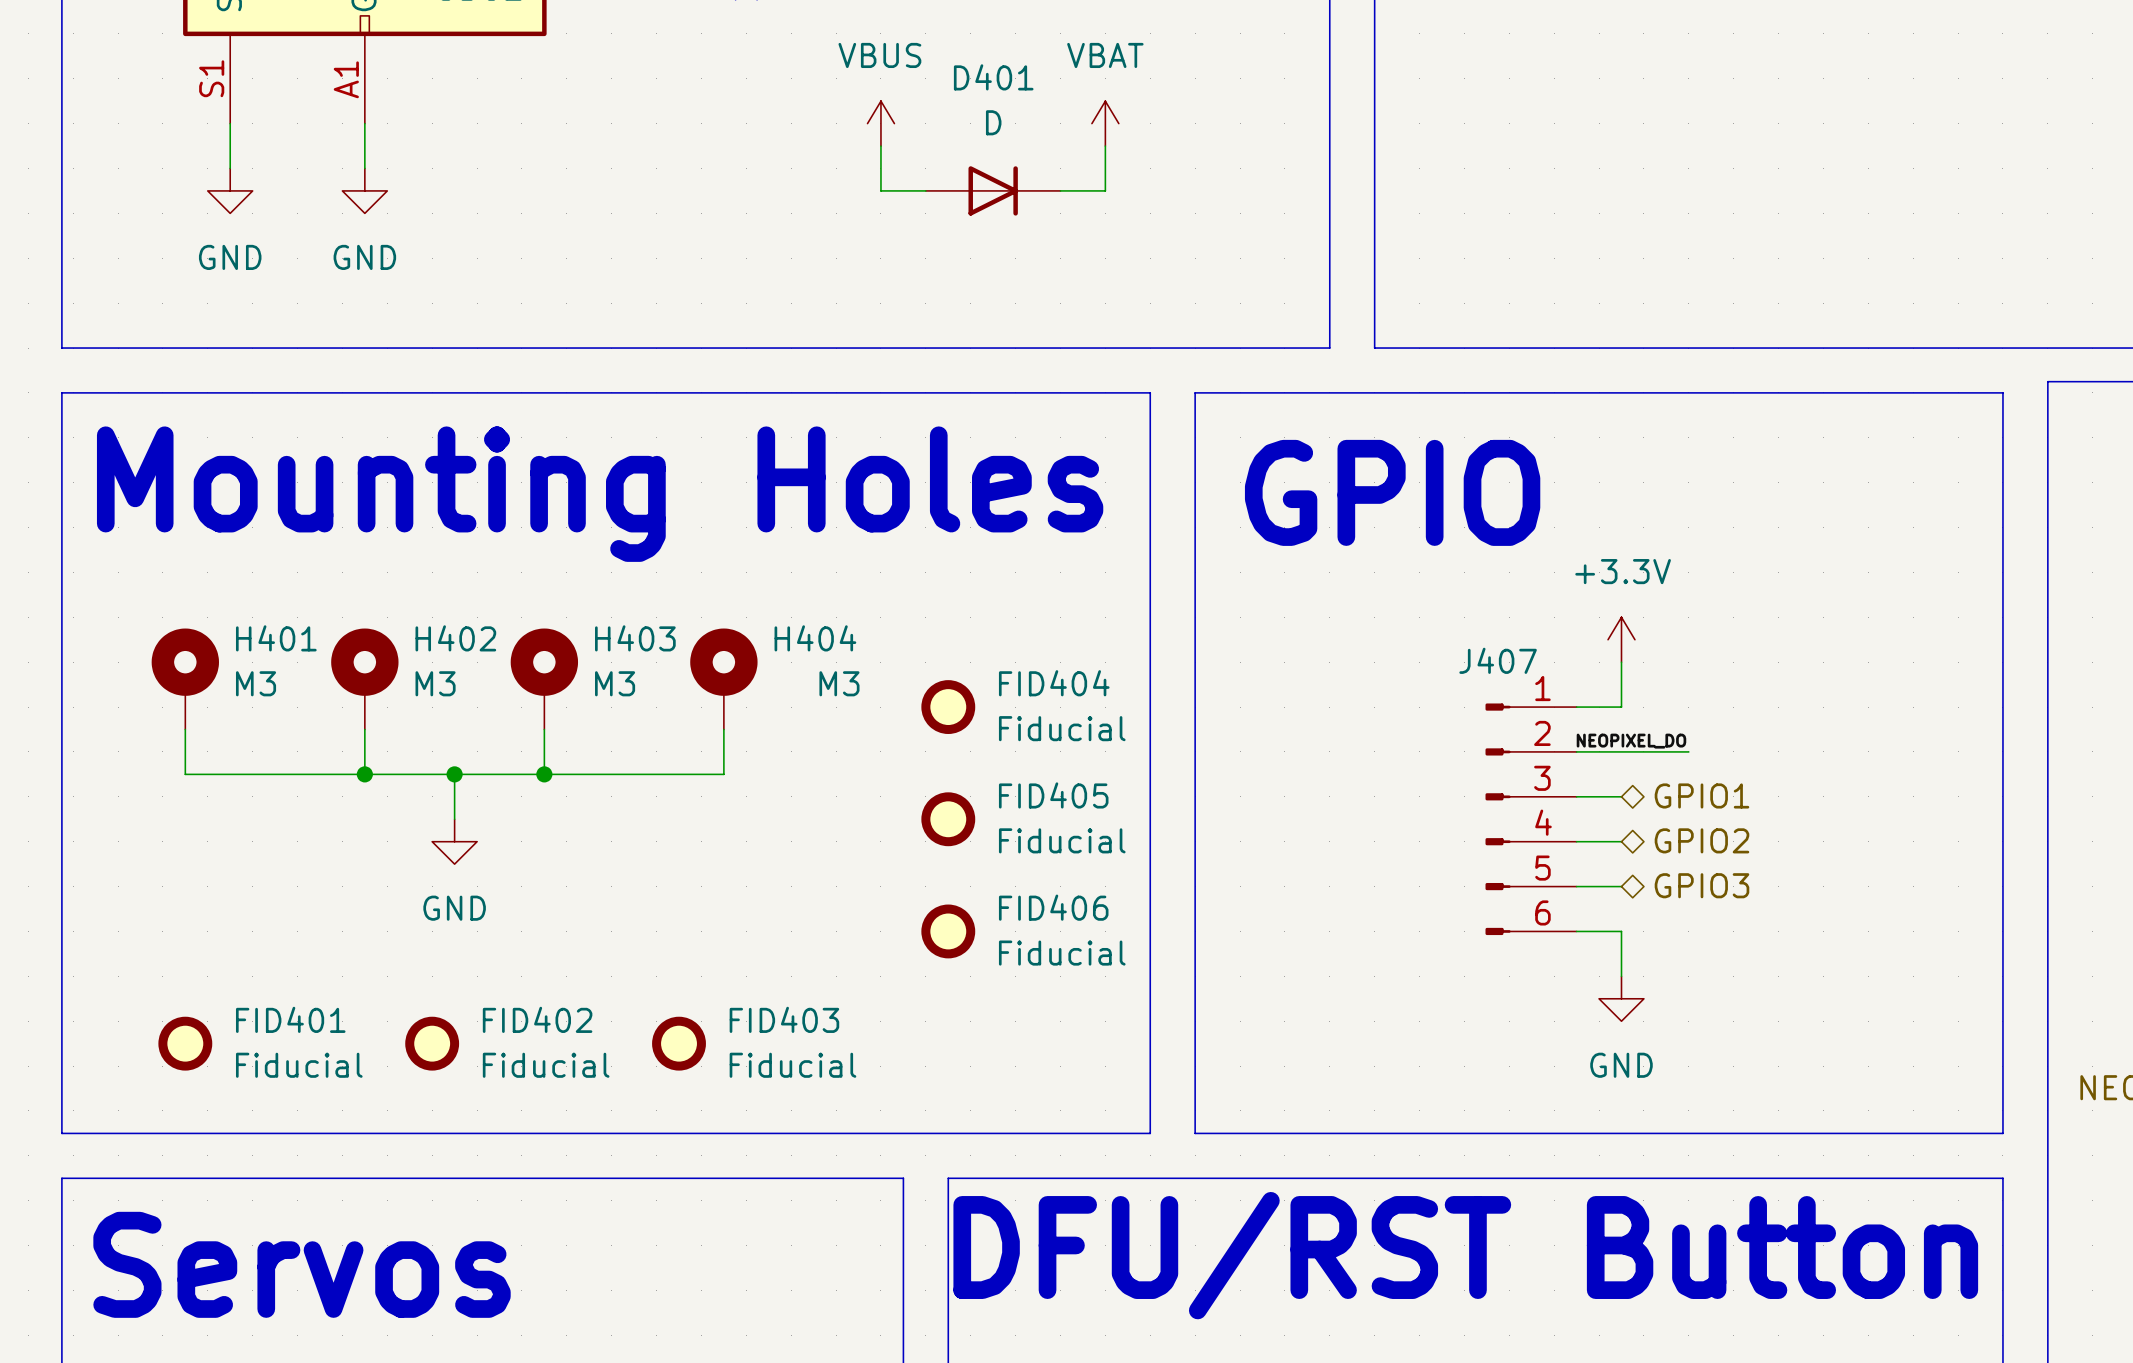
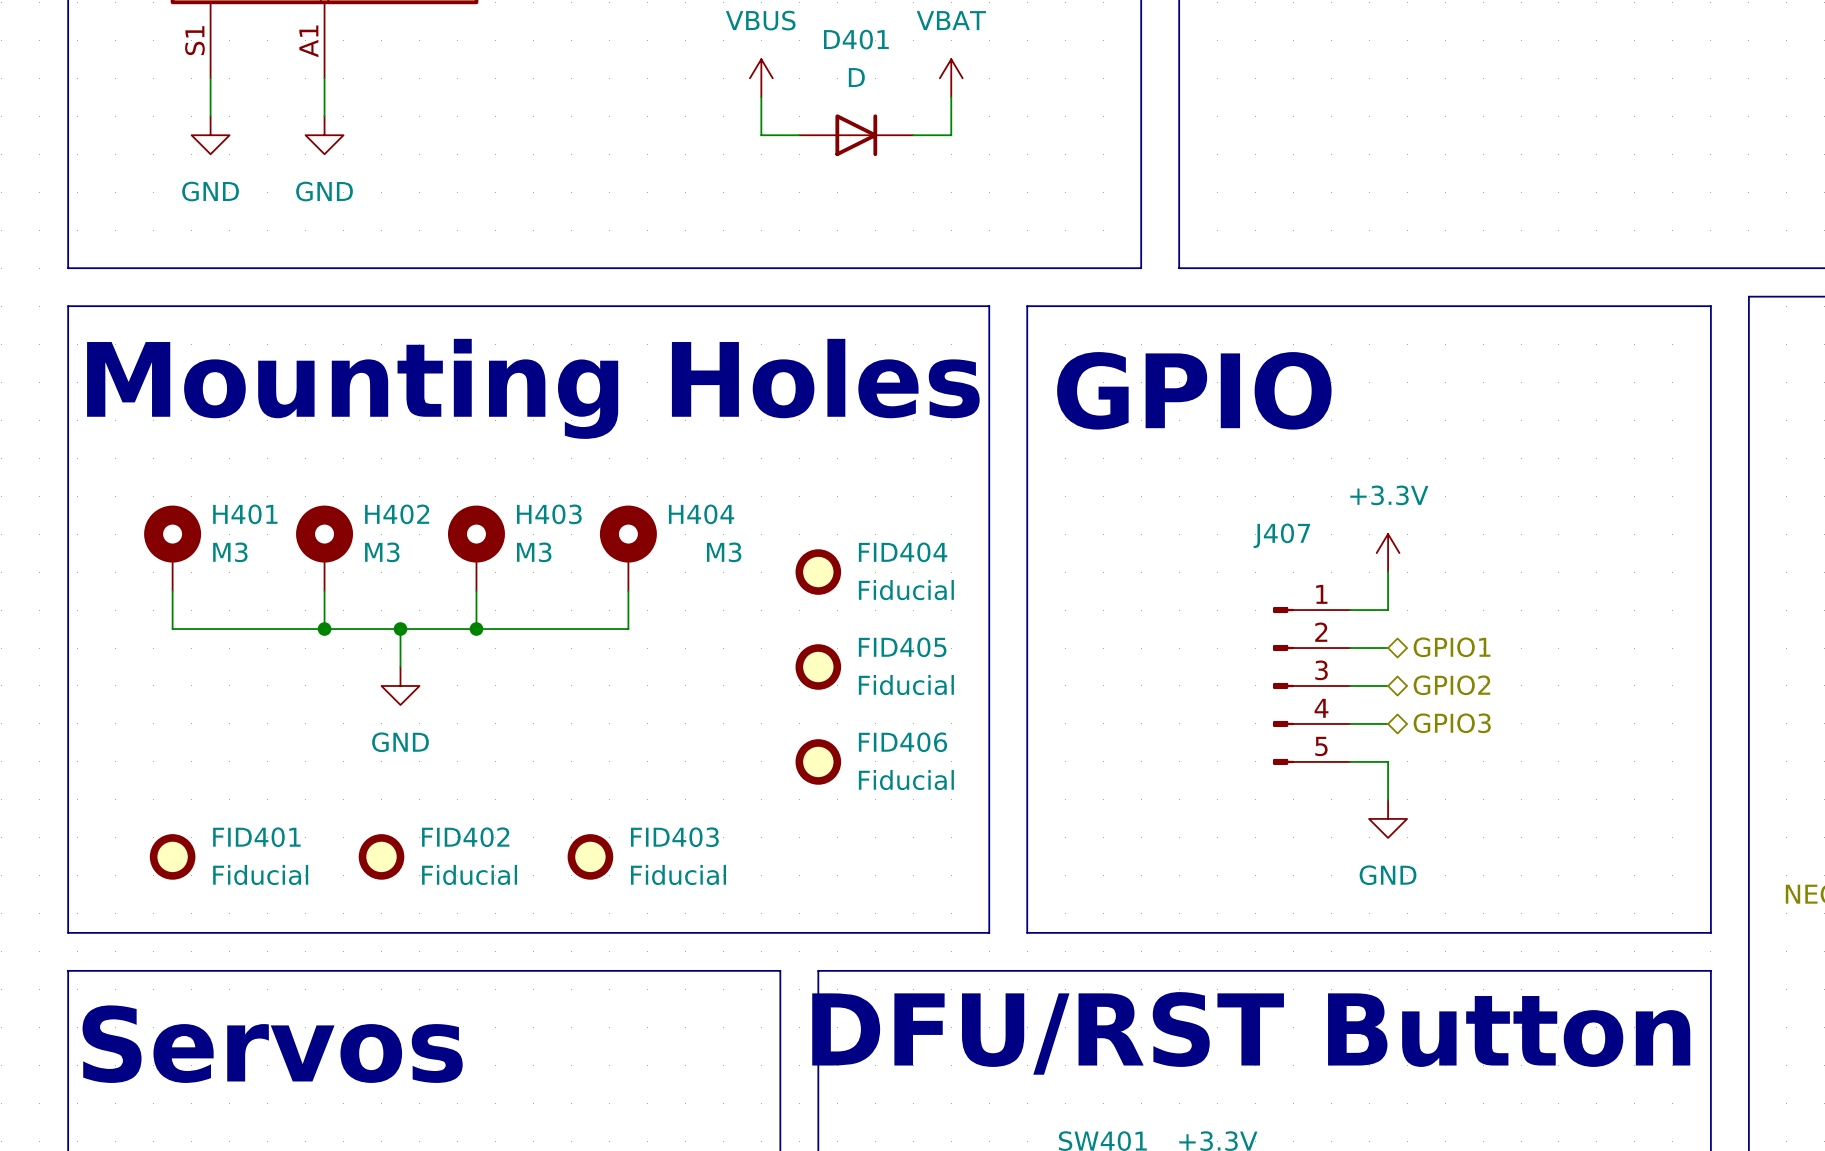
power symbol position: +3.3V (1621, 639) -> +3.3V (1388, 553)
wire: (1621, 662) (1621, 707) (1576, 707) -> none
J407 symbol: [1485, 703, 1577, 936] -> [1272, 606, 1351, 766]
label: NEOPIXEL_DO (1631, 741) -> none
wire: (1621, 751) (1688, 751) -> (1388, 610) (1388, 572)

